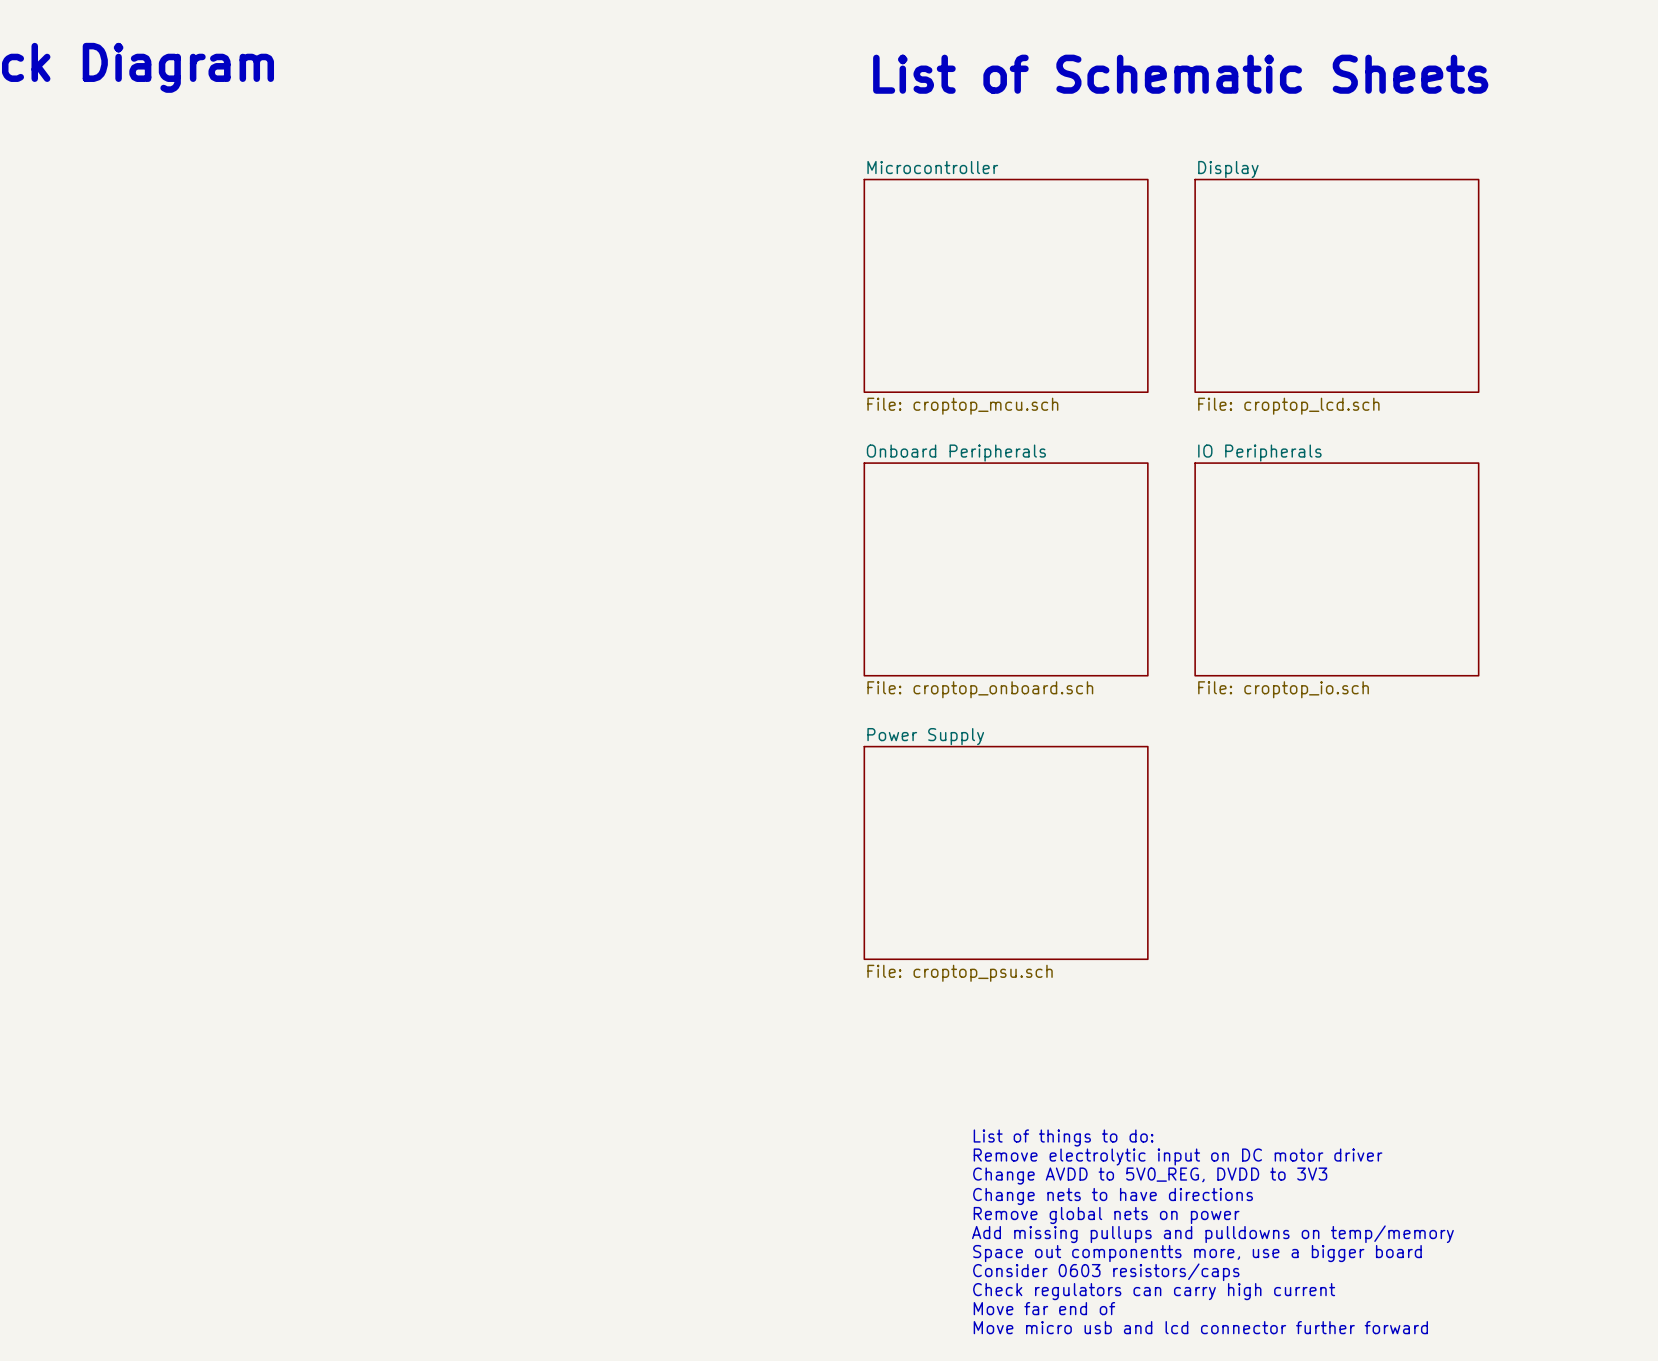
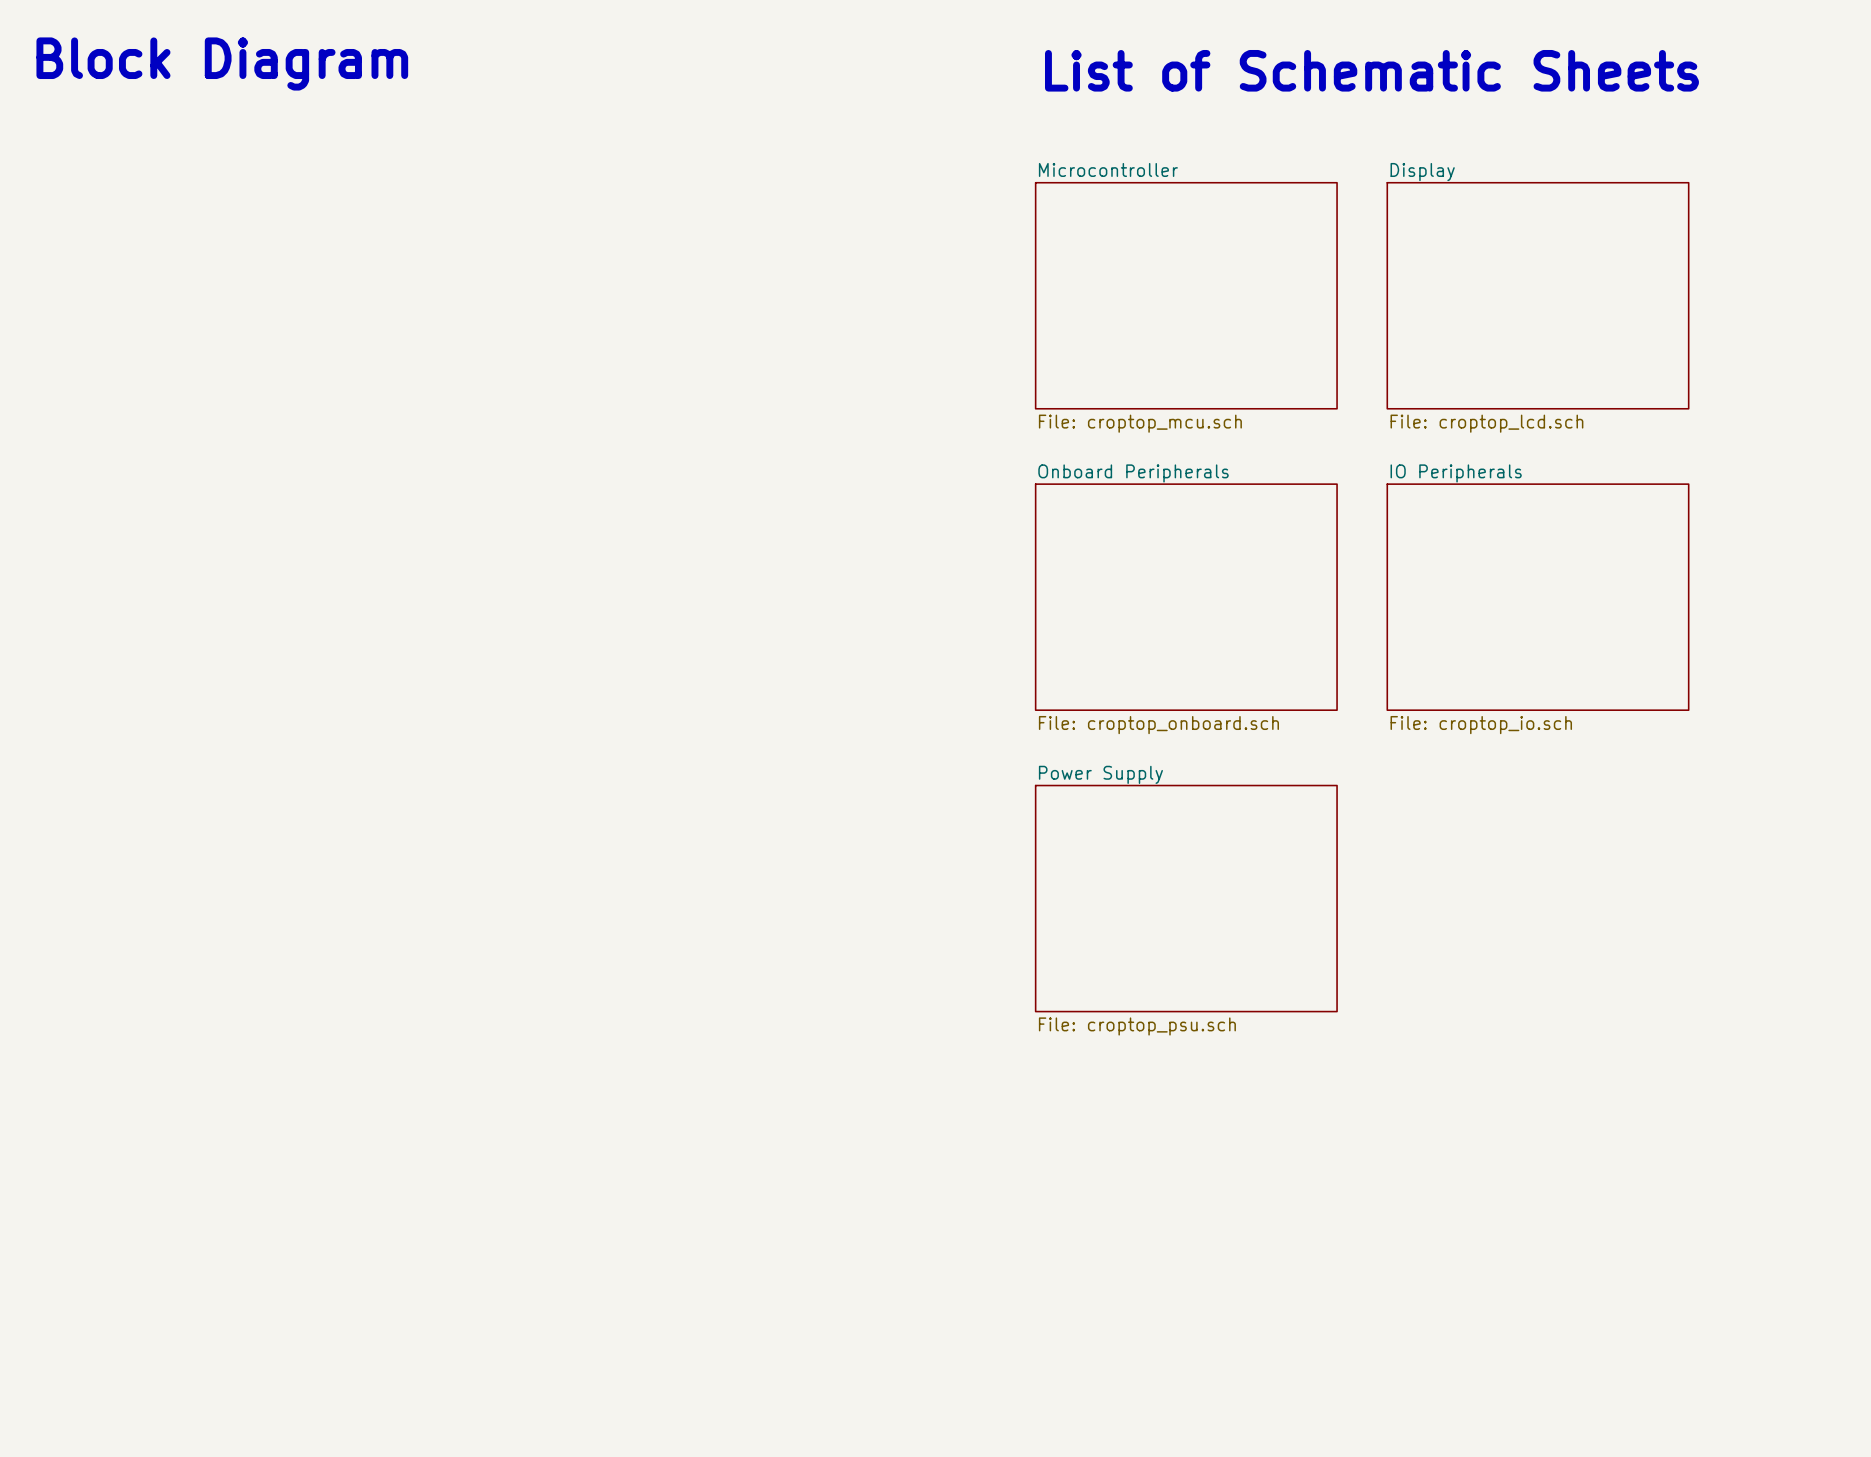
text: List of things to do: (1063, 1137) -> none
text: Remove electrolytic input on DC motor driver (1178, 1157) -> none
text: Change AVDD to 5V0_REG, DVDD to 3V3 (1150, 1176) -> none
text: Change nets to have directions (1113, 1196) -> none
text: Remove global nets on power (1106, 1215) -> none
text: Add missing pullups and pulldowns on temp/memory (1212, 1234) -> none
text: Space out componentts more, use a bigger board (1197, 1253) -> none
text: Consider 0603 resistors/caps (1106, 1272) -> none
text: Check regulators can carry high current (1154, 1291) -> none
text: Move far end of (1044, 1308) -> none
text: Move micro usb and lcd connector further forward (1200, 1327) -> none

